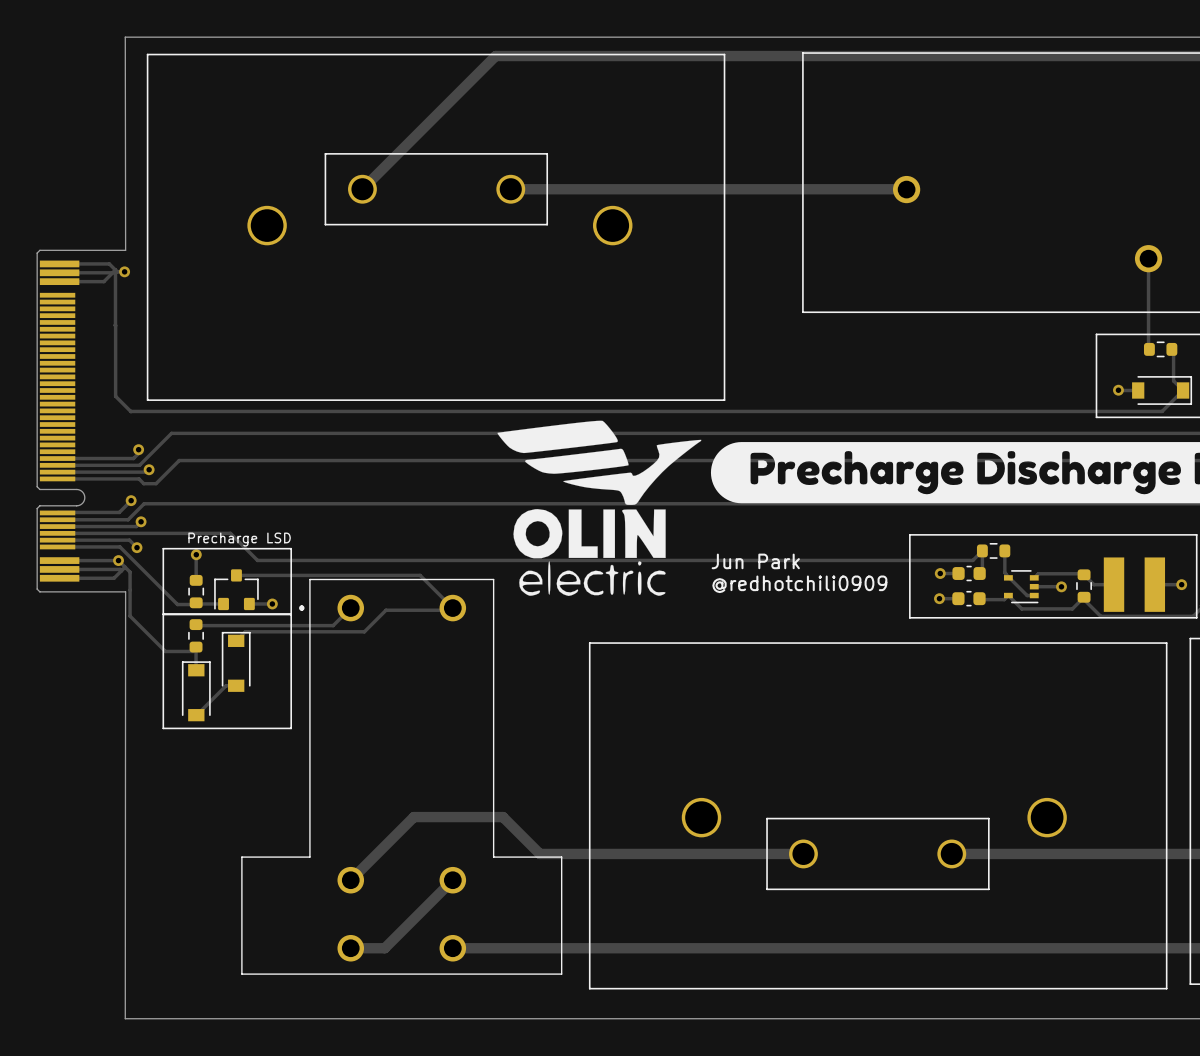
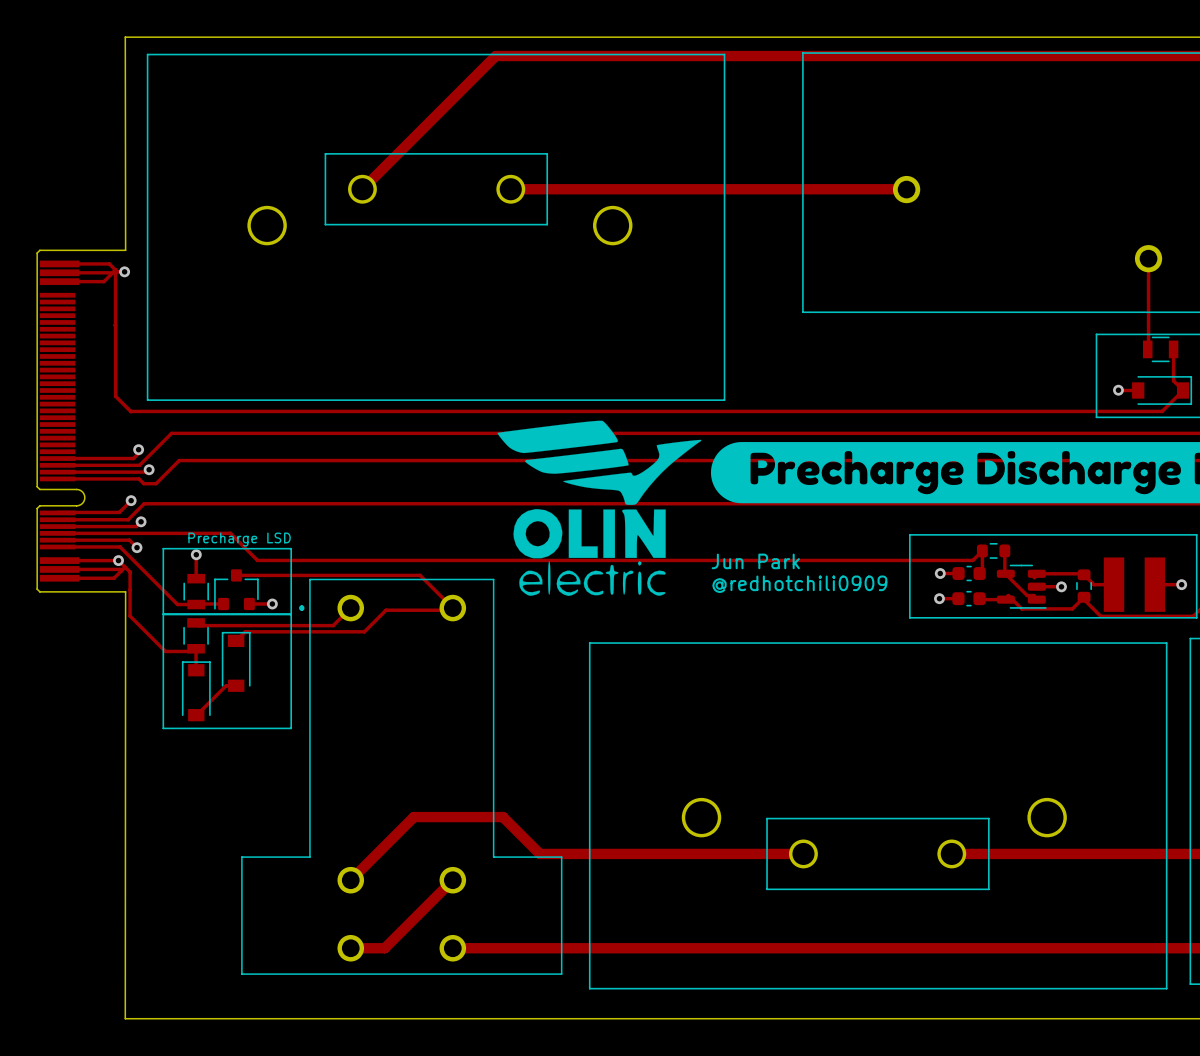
part footprint: [1143, 341, 1178, 358] -> [1142, 336, 1179, 363]
part footprint: [1004, 570, 1039, 604] -> [996, 564, 1047, 609]
part footprint: [188, 574, 205, 609] -> [183, 573, 209, 610]
part footprint: [188, 619, 204, 653] -> [183, 618, 209, 654]

